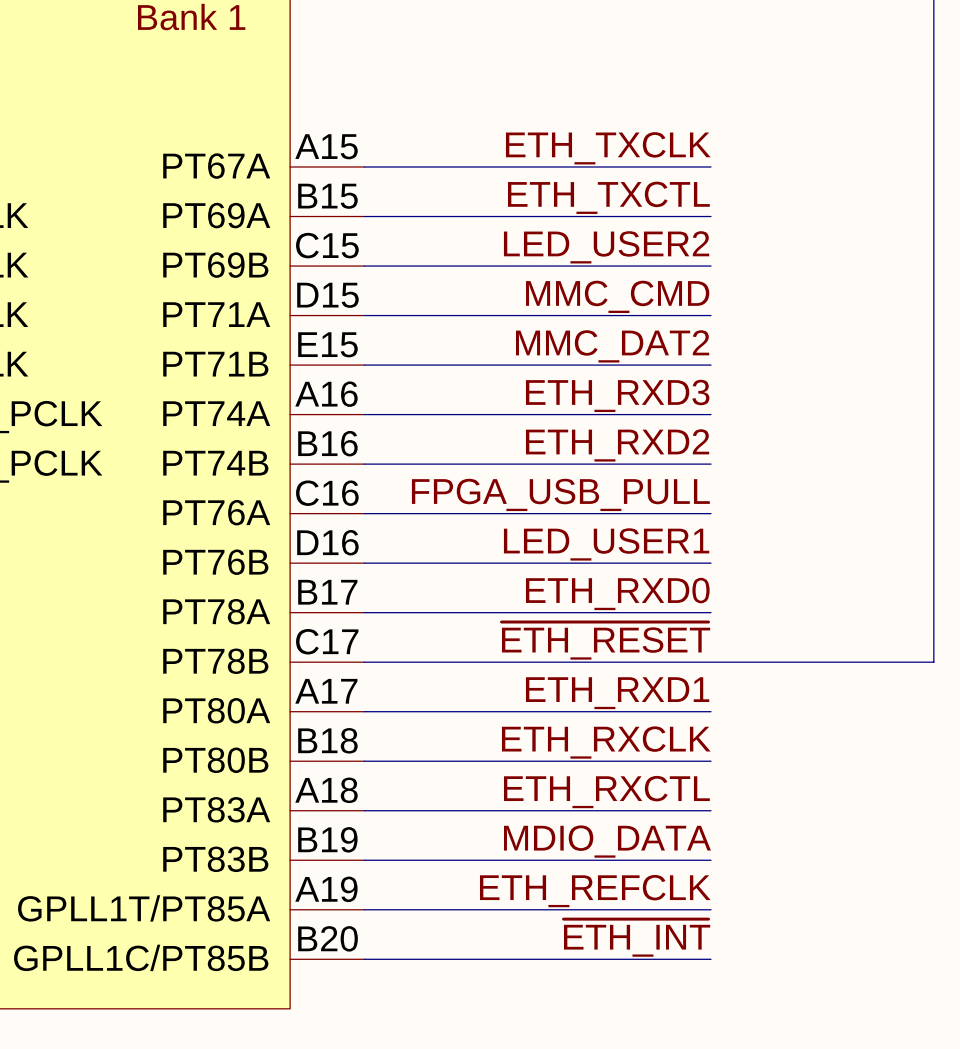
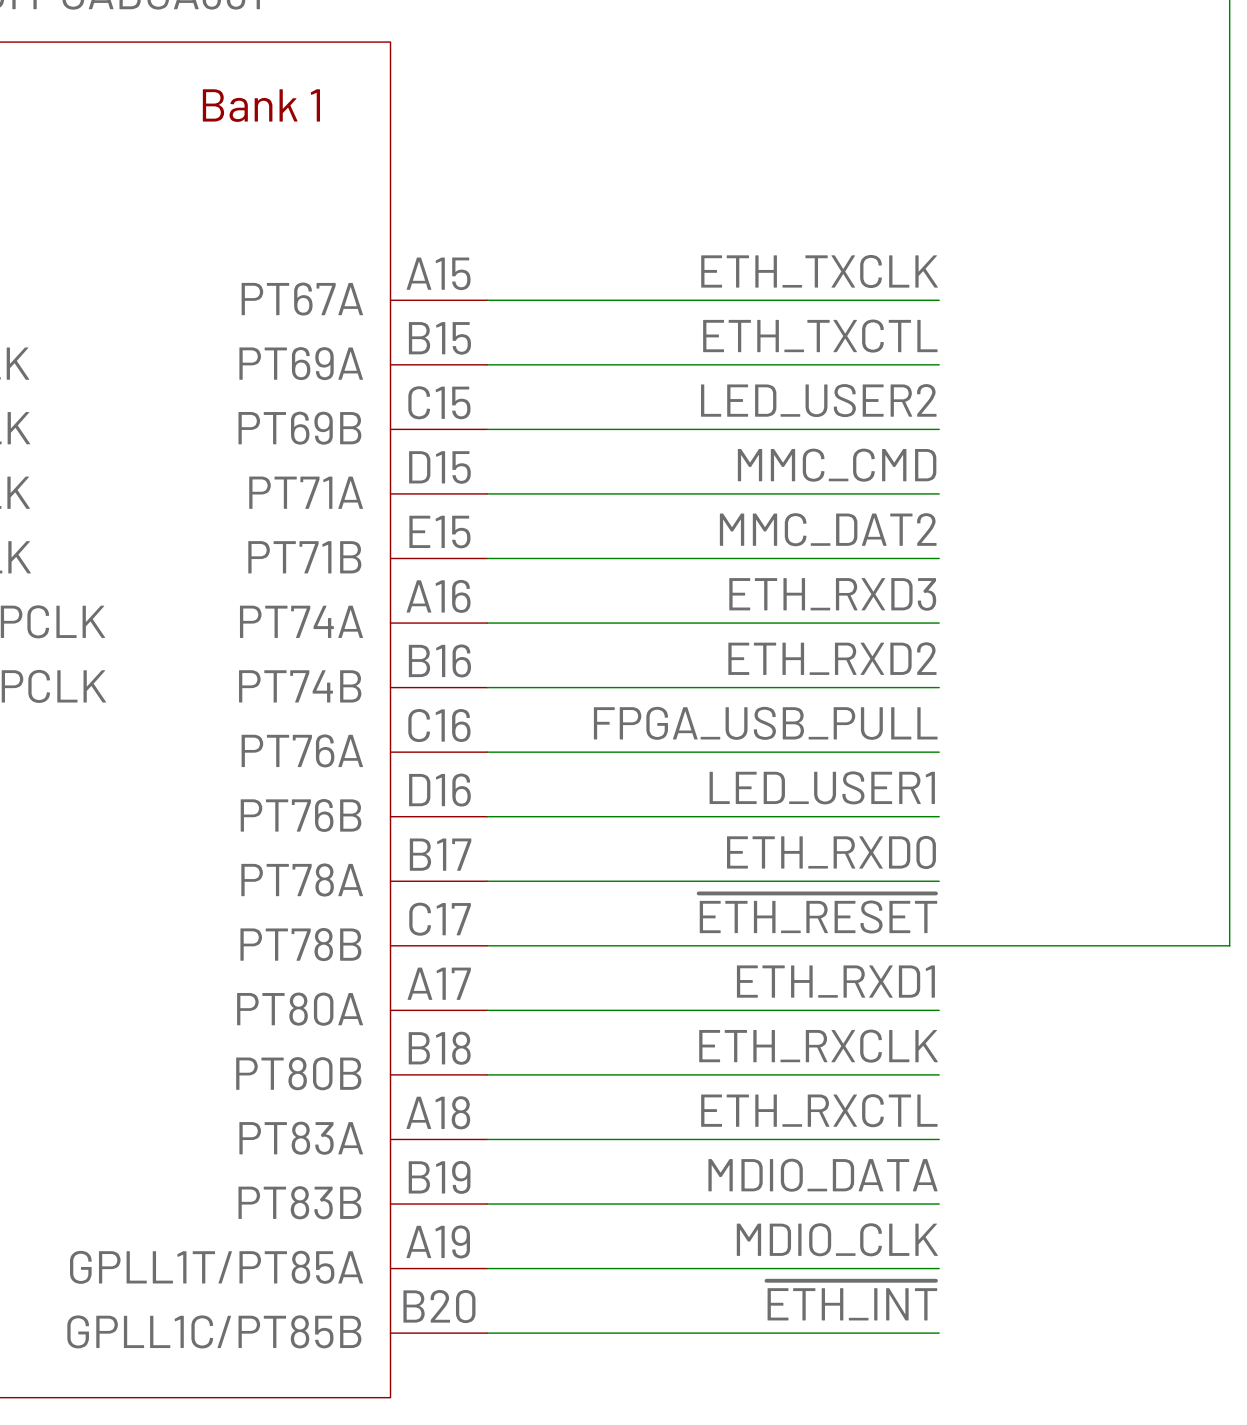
label: ETH_REFCLK (595, 891) -> MDIO_CLK (837, 1239)

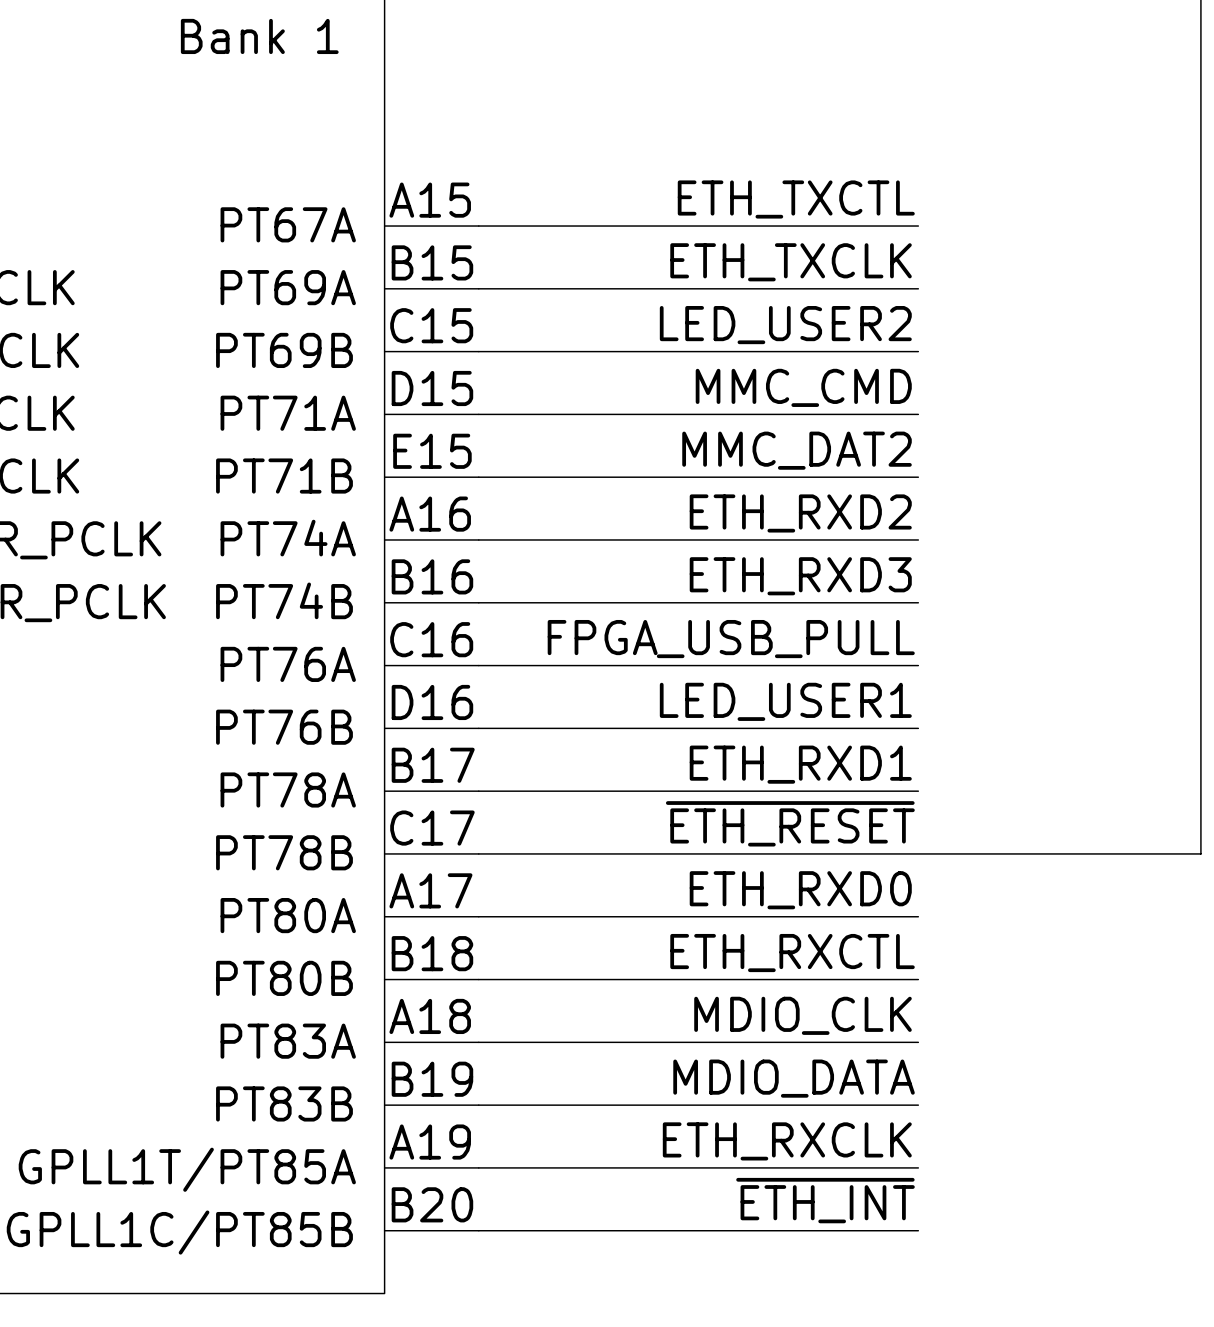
label: ETH_TXCLK (819, 271) -> ETH_TXCTL (796, 199)
label: ETH_TXCTL (820, 336) -> ETH_TXCLK (791, 262)
label: ETH_RXD3 (832, 594) -> ETH_RXD2 (800, 513)
label: ETH_RXD2 (832, 658) -> ETH_RXD3 (800, 576)
label: ETH_RXD0 (831, 852) -> ETH_RXD1 (800, 764)
label: ETH_RXD1 (835, 981) -> ETH_RXD0 (800, 890)
label: ETH_RXCLK (818, 1046) -> ETH_RXCTL (792, 953)
label: ETH_RXCTL (819, 1110) -> MDIO_CLK (802, 1015)
label: MDIO_CLK (837, 1239) -> ETH_RXCLK (787, 1141)

